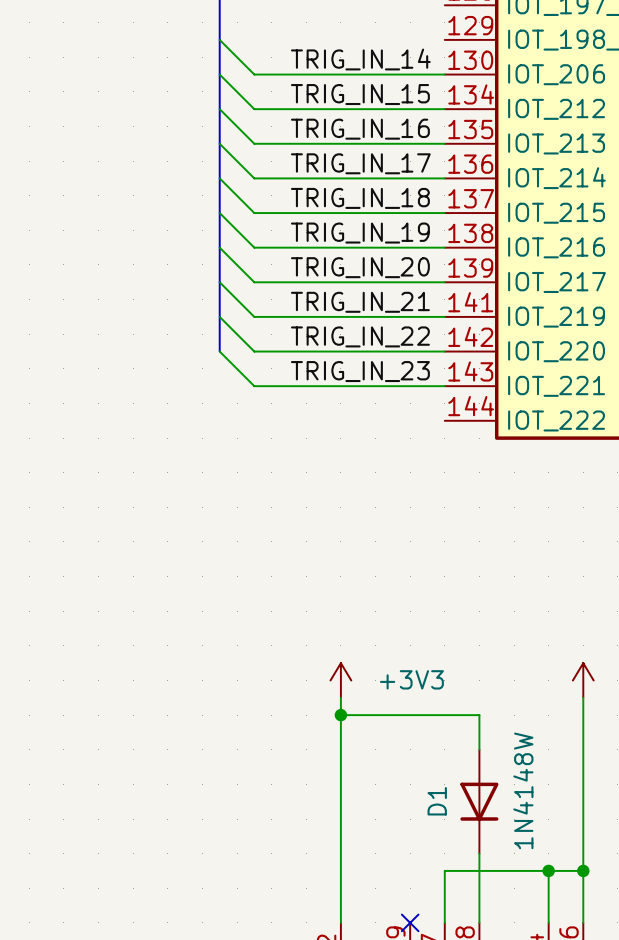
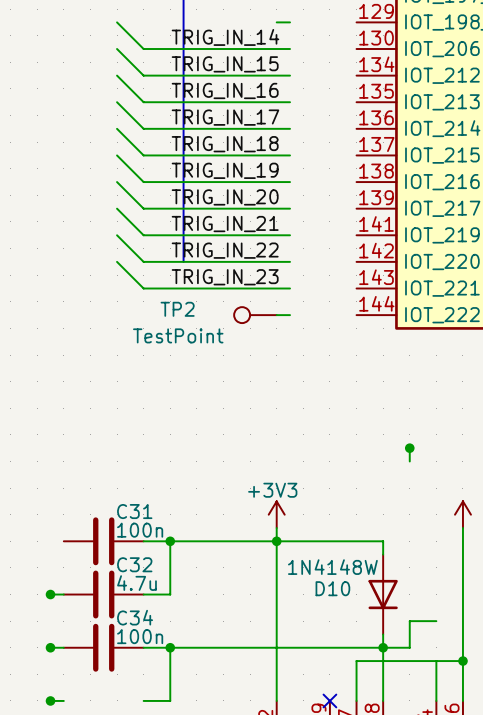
wire: (219, 39) (254, 74) -> (117, 22) (143, 49) (210, 49)
wire: none -> (276, 22) (290, 22)
label position: TRIG_IN_14 (360, 59) -> TRIG_IN_14 (225, 37)
wire: (219, 74) (254, 109) -> (117, 49) (143, 75) (210, 75)
wire: (358, 74) (444, 74) -> none
label position: TRIG_IN_15 (360, 94) -> TRIG_IN_15 (225, 64)
wire: (219, 109) (254, 143) -> (117, 75) (143, 102) (210, 102)
wire: (358, 109) (444, 109) -> none
label position: TRIG_IN_16 (360, 129) -> TRIG_IN_16 (225, 90)
wire: (219, 143) (254, 178) -> (117, 102) (143, 128) (210, 128)
wire: (358, 143) (444, 143) -> none
label position: TRIG_IN_17 (360, 163) -> TRIG_IN_17 (225, 117)
wire: (219, 178) (254, 213) -> (117, 128) (143, 155) (210, 155)
wire: (358, 178) (444, 178) -> none
label position: TRIG_IN_18 (360, 198) -> TRIG_IN_18 (225, 144)
wire: (219, 213) (254, 247) -> (117, 155) (143, 182) (210, 182)
wire: (358, 213) (444, 213) -> none
label position: TRIG_IN_19 (360, 233) -> TRIG_IN_19 (225, 170)
wire: (219, 247) (254, 282) -> (117, 182) (143, 208) (210, 208)
wire: (358, 247) (444, 247) -> none
label position: TRIG_IN_20 (360, 267) -> TRIG_IN_20 (225, 197)
wire: (219, 282) (254, 316) -> (117, 208) (143, 235) (210, 235)
wire: (358, 282) (444, 282) -> none
label position: TRIG_IN_21 (360, 302) -> TRIG_IN_21 (225, 224)
wire: (219, 316) (254, 351) -> (117, 235) (143, 261) (210, 261)
wire: (358, 316) (444, 316) -> none
label position: TRIG_IN_22 (360, 336) -> TRIG_IN_22 (225, 250)
wire: (219, 351) (254, 386) -> (117, 261) (143, 288) (210, 288)
wire: (358, 351) (444, 351) -> none
label position: TRIG_IN_23 (360, 371) -> TRIG_IN_23 (225, 277)
wire: (358, 386) (444, 386) -> none
TP2: none -> TestPoint (255, 315)
wire: none -> (276, 315) (290, 315)
wire: none -> (409, 448) (409, 461)
junction: none -> (409, 448)
power symbol text position: +3V3 (411, 679) -> +3V3 (272, 490)
C31: none -> 100n (103, 541)
wire: none -> (143, 541) (276, 541)
wire: none -> (170, 541) (170, 594) (143, 594)
junction: none -> (170, 541)
wire: none -> (50, 594) (63, 594)
junction: none -> (50, 594)
C32: none -> 4.7u (103, 594)
D10: none -> 1N4148W (383, 594)
D1: 1N4148W (479, 801) -> none
wire: none -> (436, 621) (409, 621) (409, 647) (143, 647)
wire: none -> (50, 647) (63, 647)
junction: none -> (50, 647)
C34: none -> 100n (103, 647)
wire: none -> (170, 647) (170, 700) (143, 700)
junction: none -> (170, 647)
junction position: (548, 870) -> (383, 647)
wire: none -> (50, 700) (63, 700)
junction: none -> (50, 700)

